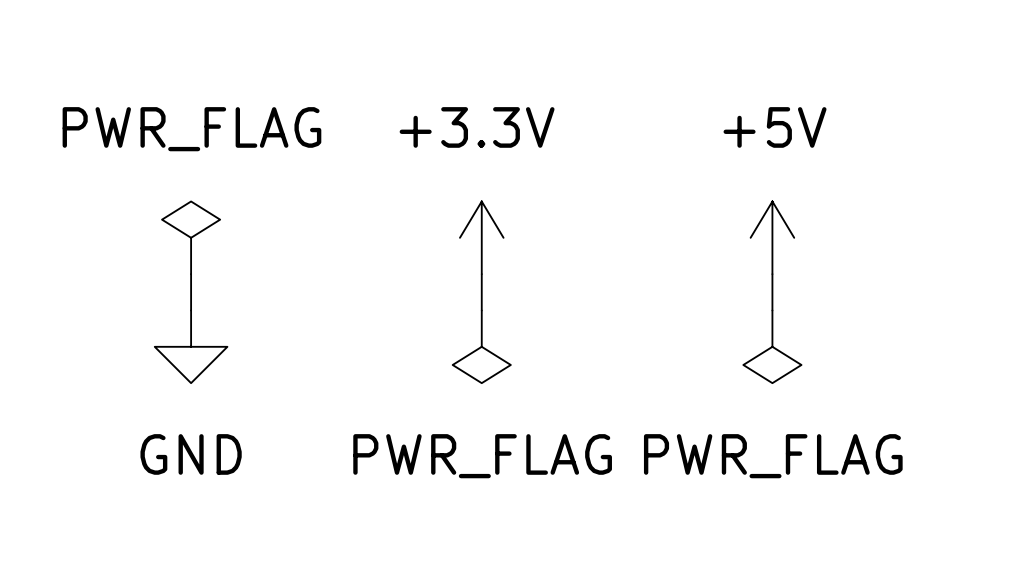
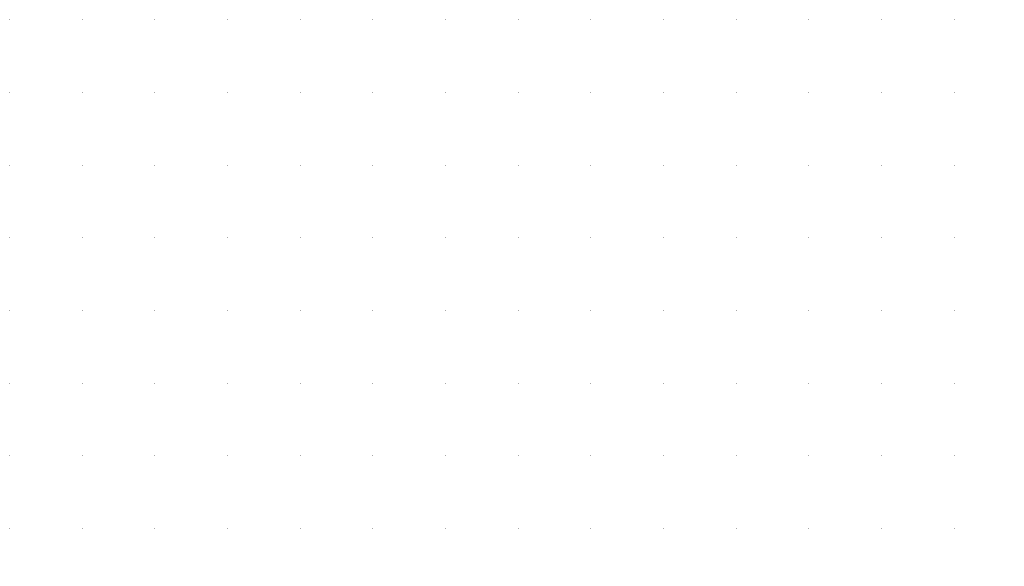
power symbol: PWR_FLAG (191, 237) -> none
power symbol: +3.3V (481, 237) -> none
power symbol: +5V (772, 237) -> none
wire: (191, 274) (191, 310) -> none
wire: (481, 274) (481, 310) -> none
wire: (772, 274) (772, 310) -> none
power symbol: GND (191, 346) -> none
power symbol: PWR_FLAG (481, 346) -> none
power symbol: PWR_FLAG (772, 346) -> none

